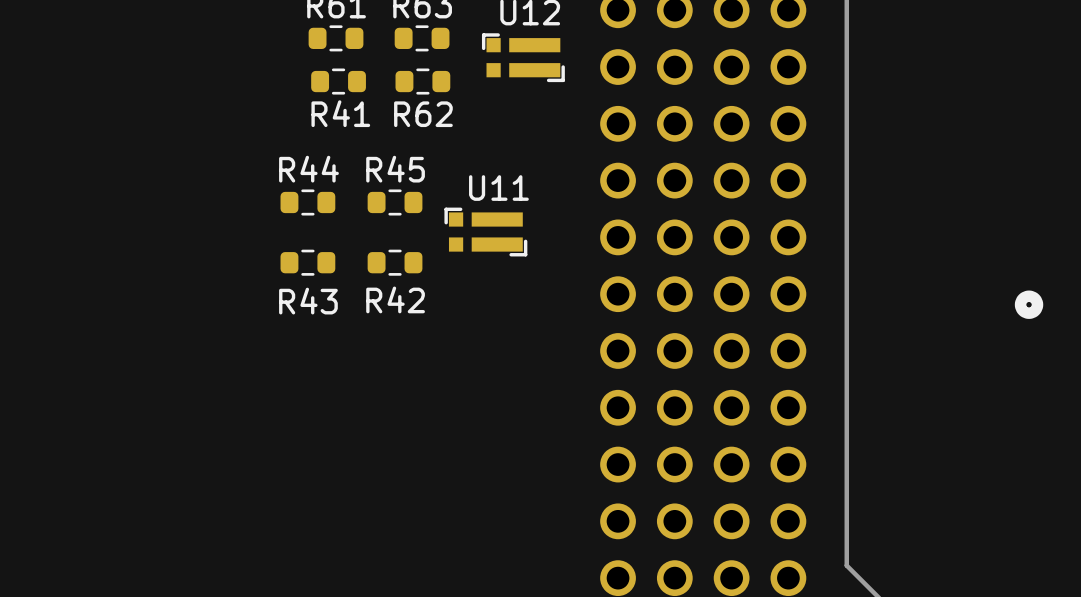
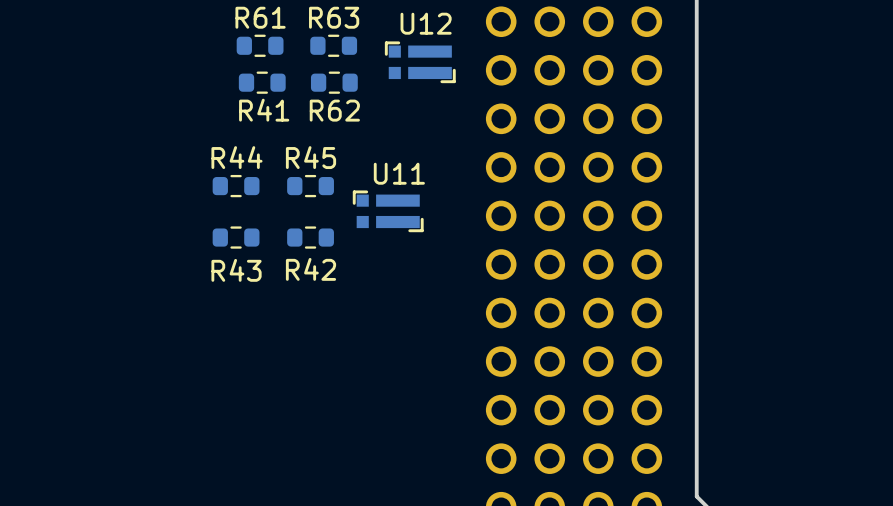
part: (1029, 304) -> none

